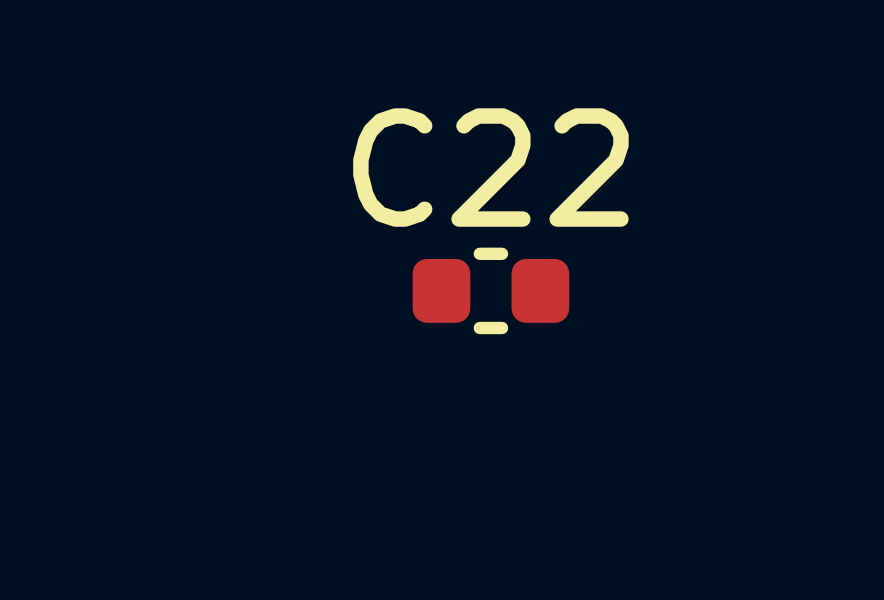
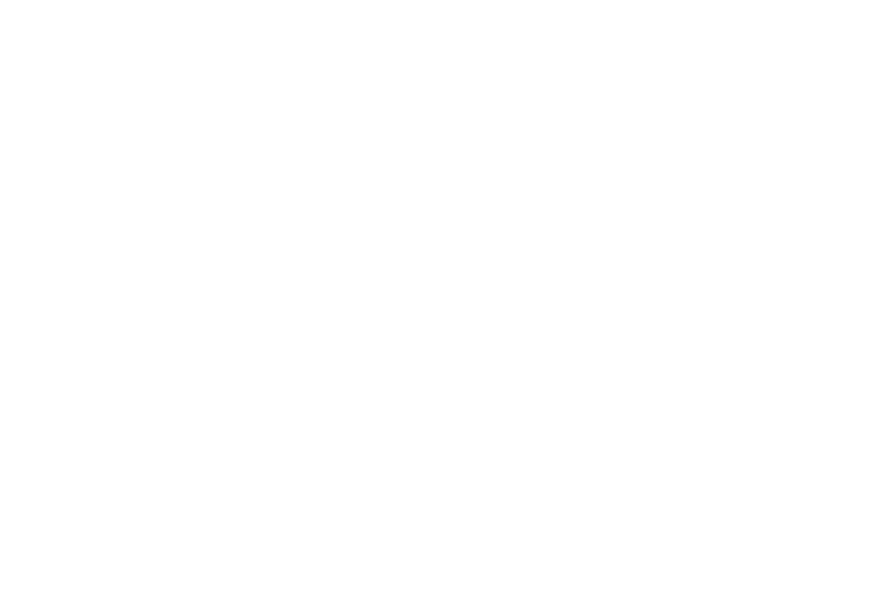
C22: (490, 290) -> none

